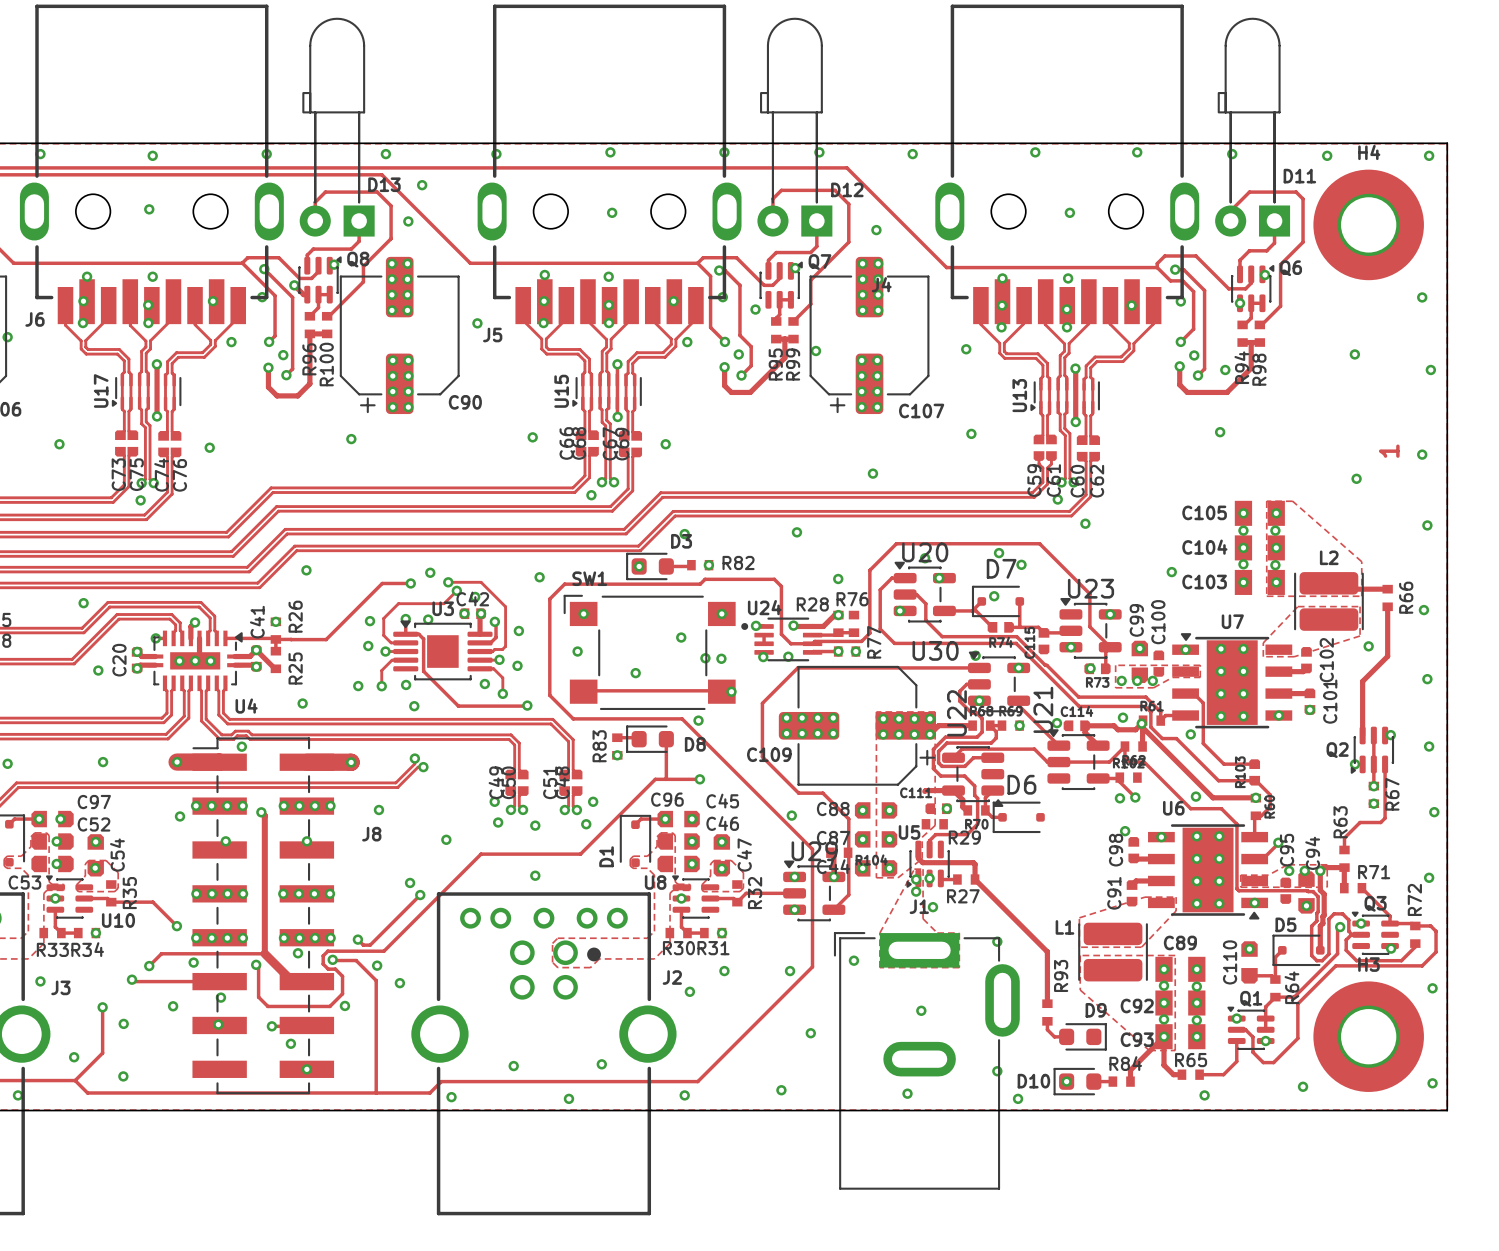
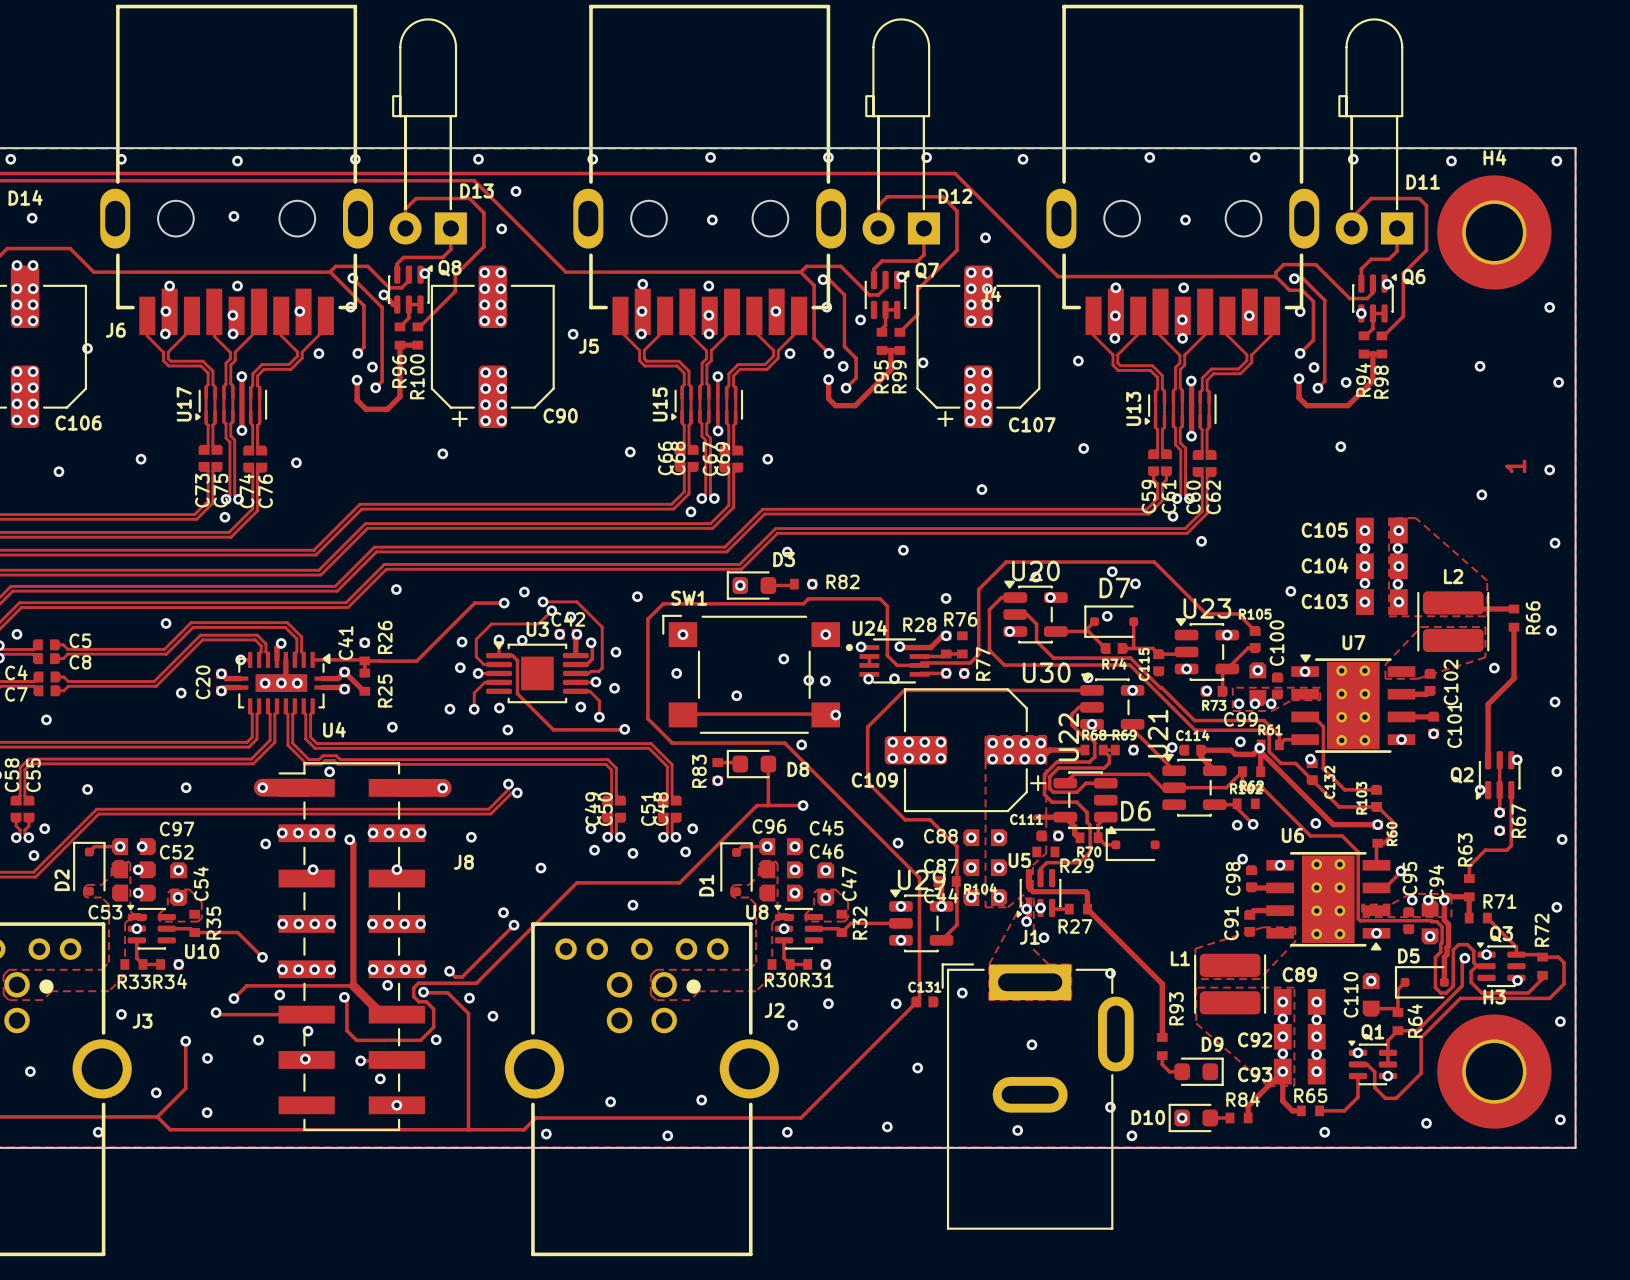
track: (1089, 594) (1089, 626) (1110, 647) -> (1206, 613) (1238, 613) (1255, 630)
R105: none -> (1255, 639)
C99 name rotation: 0° (1136, 620) -> 90° clockwise (1240, 719)
C99 name position: C99 (1136, 620) -> C99 (1240, 719)
track: none -> (1255, 648) (1248, 648) (1227, 668)
C132: none -> (1312, 771)
C131: none -> (924, 1001)

